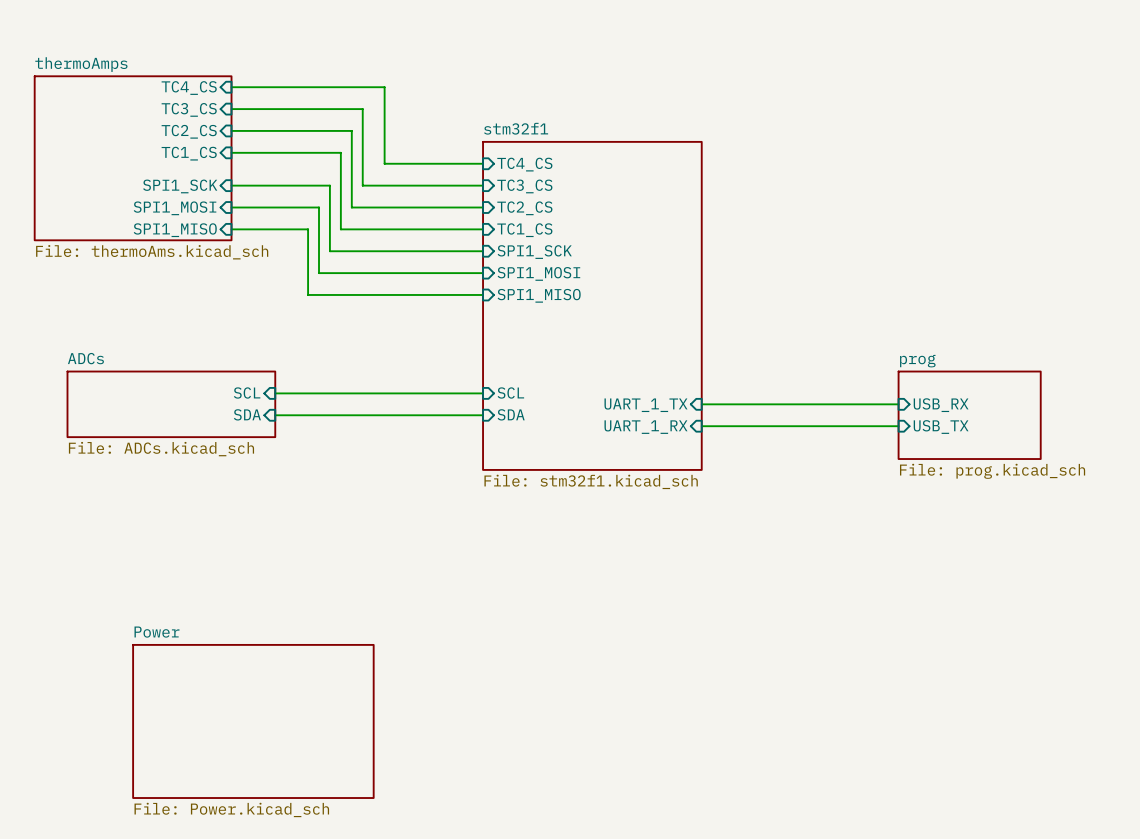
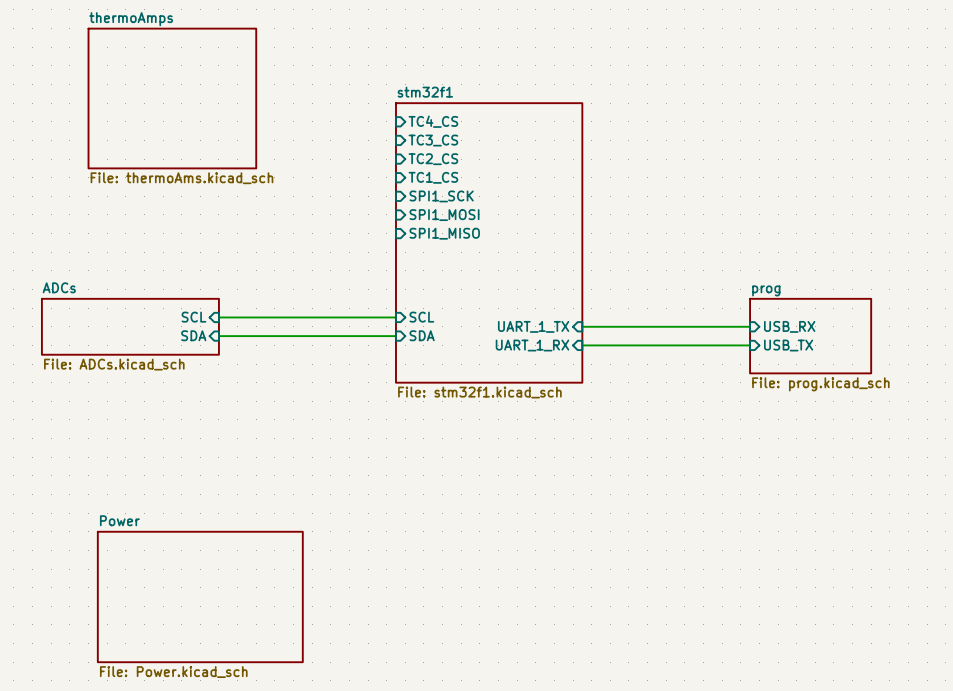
wire: (231, 87) (384, 87) (384, 163) (483, 163) -> none
sheet pin: TC4_CS (189, 88) -> none
sheet pin: TC3_CS (189, 109) -> none
wire: (231, 109) (362, 109) (362, 185) (483, 185) -> none
wire: (231, 130) (351, 130) (351, 207) (483, 207) -> none
sheet pin: TC2_CS (189, 131) -> none
wire: (231, 152) (340, 152) (340, 229) (483, 229) -> none
sheet pin: TC1_CS (189, 153) -> none
sheet thermoAmps position: (133, 158) -> (172, 98)
wire: (231, 185) (329, 185) (329, 251) (483, 251) -> none
sheet pin: SPI1_SCK (180, 186) -> none
wire: (231, 207) (319, 207) (319, 273) (483, 273) -> none
sheet pin: SPI1_MOSI (175, 208) -> none
wire: (231, 229) (308, 229) (308, 294) (483, 294) -> none
sheet pin: SPI1_MISO (175, 230) -> none

